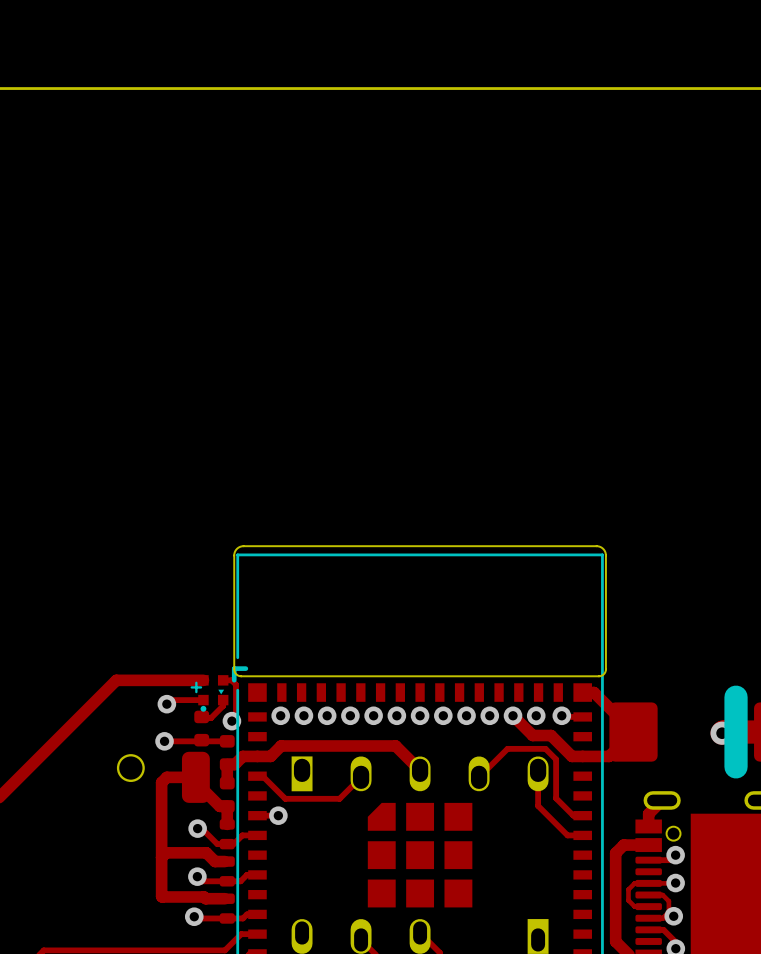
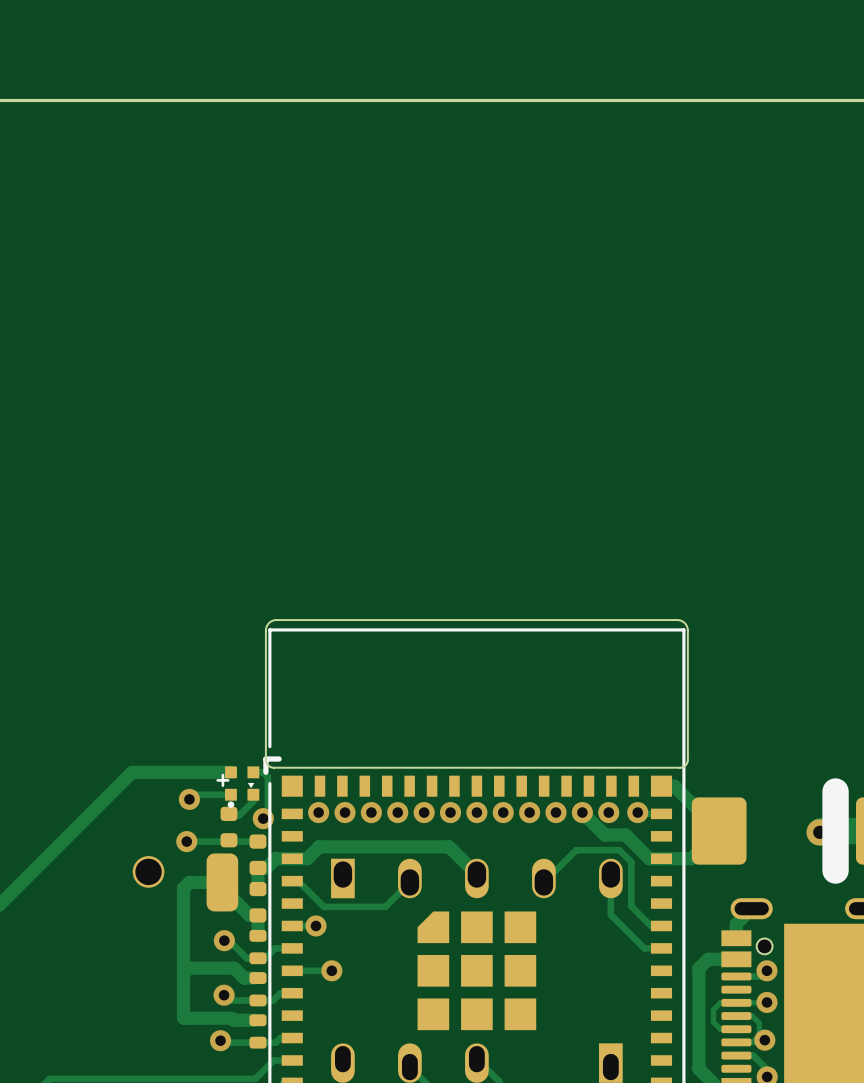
track: none -> (292, 970) (331, 970)
via: none -> (331, 970)

